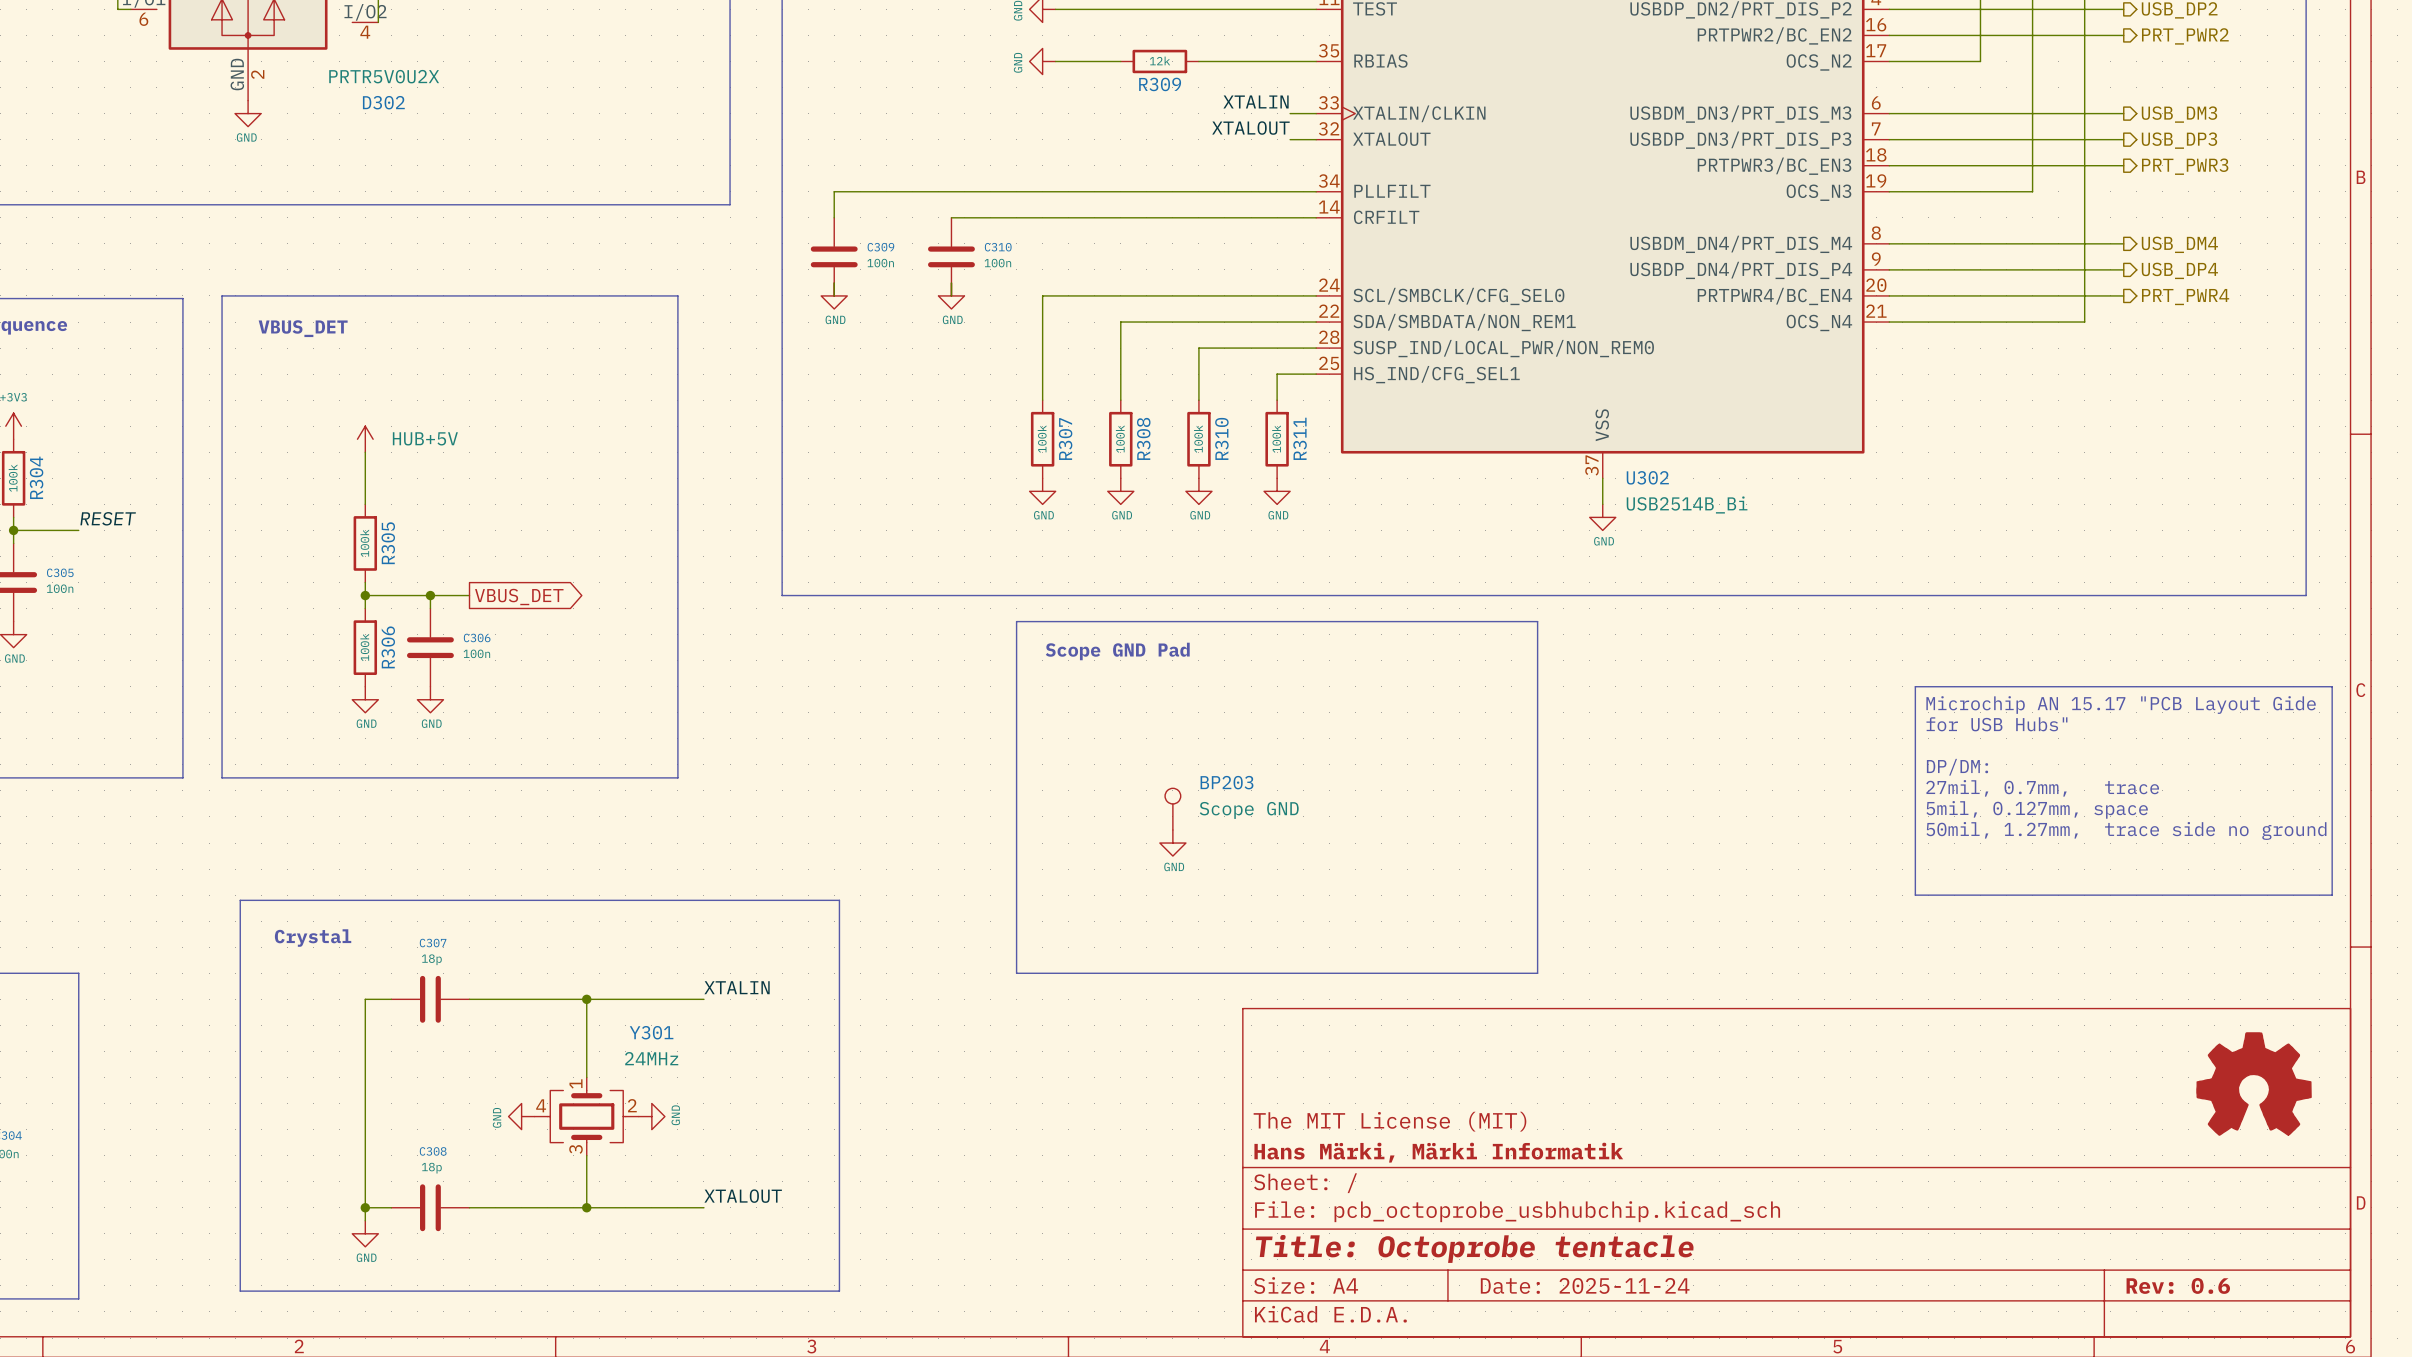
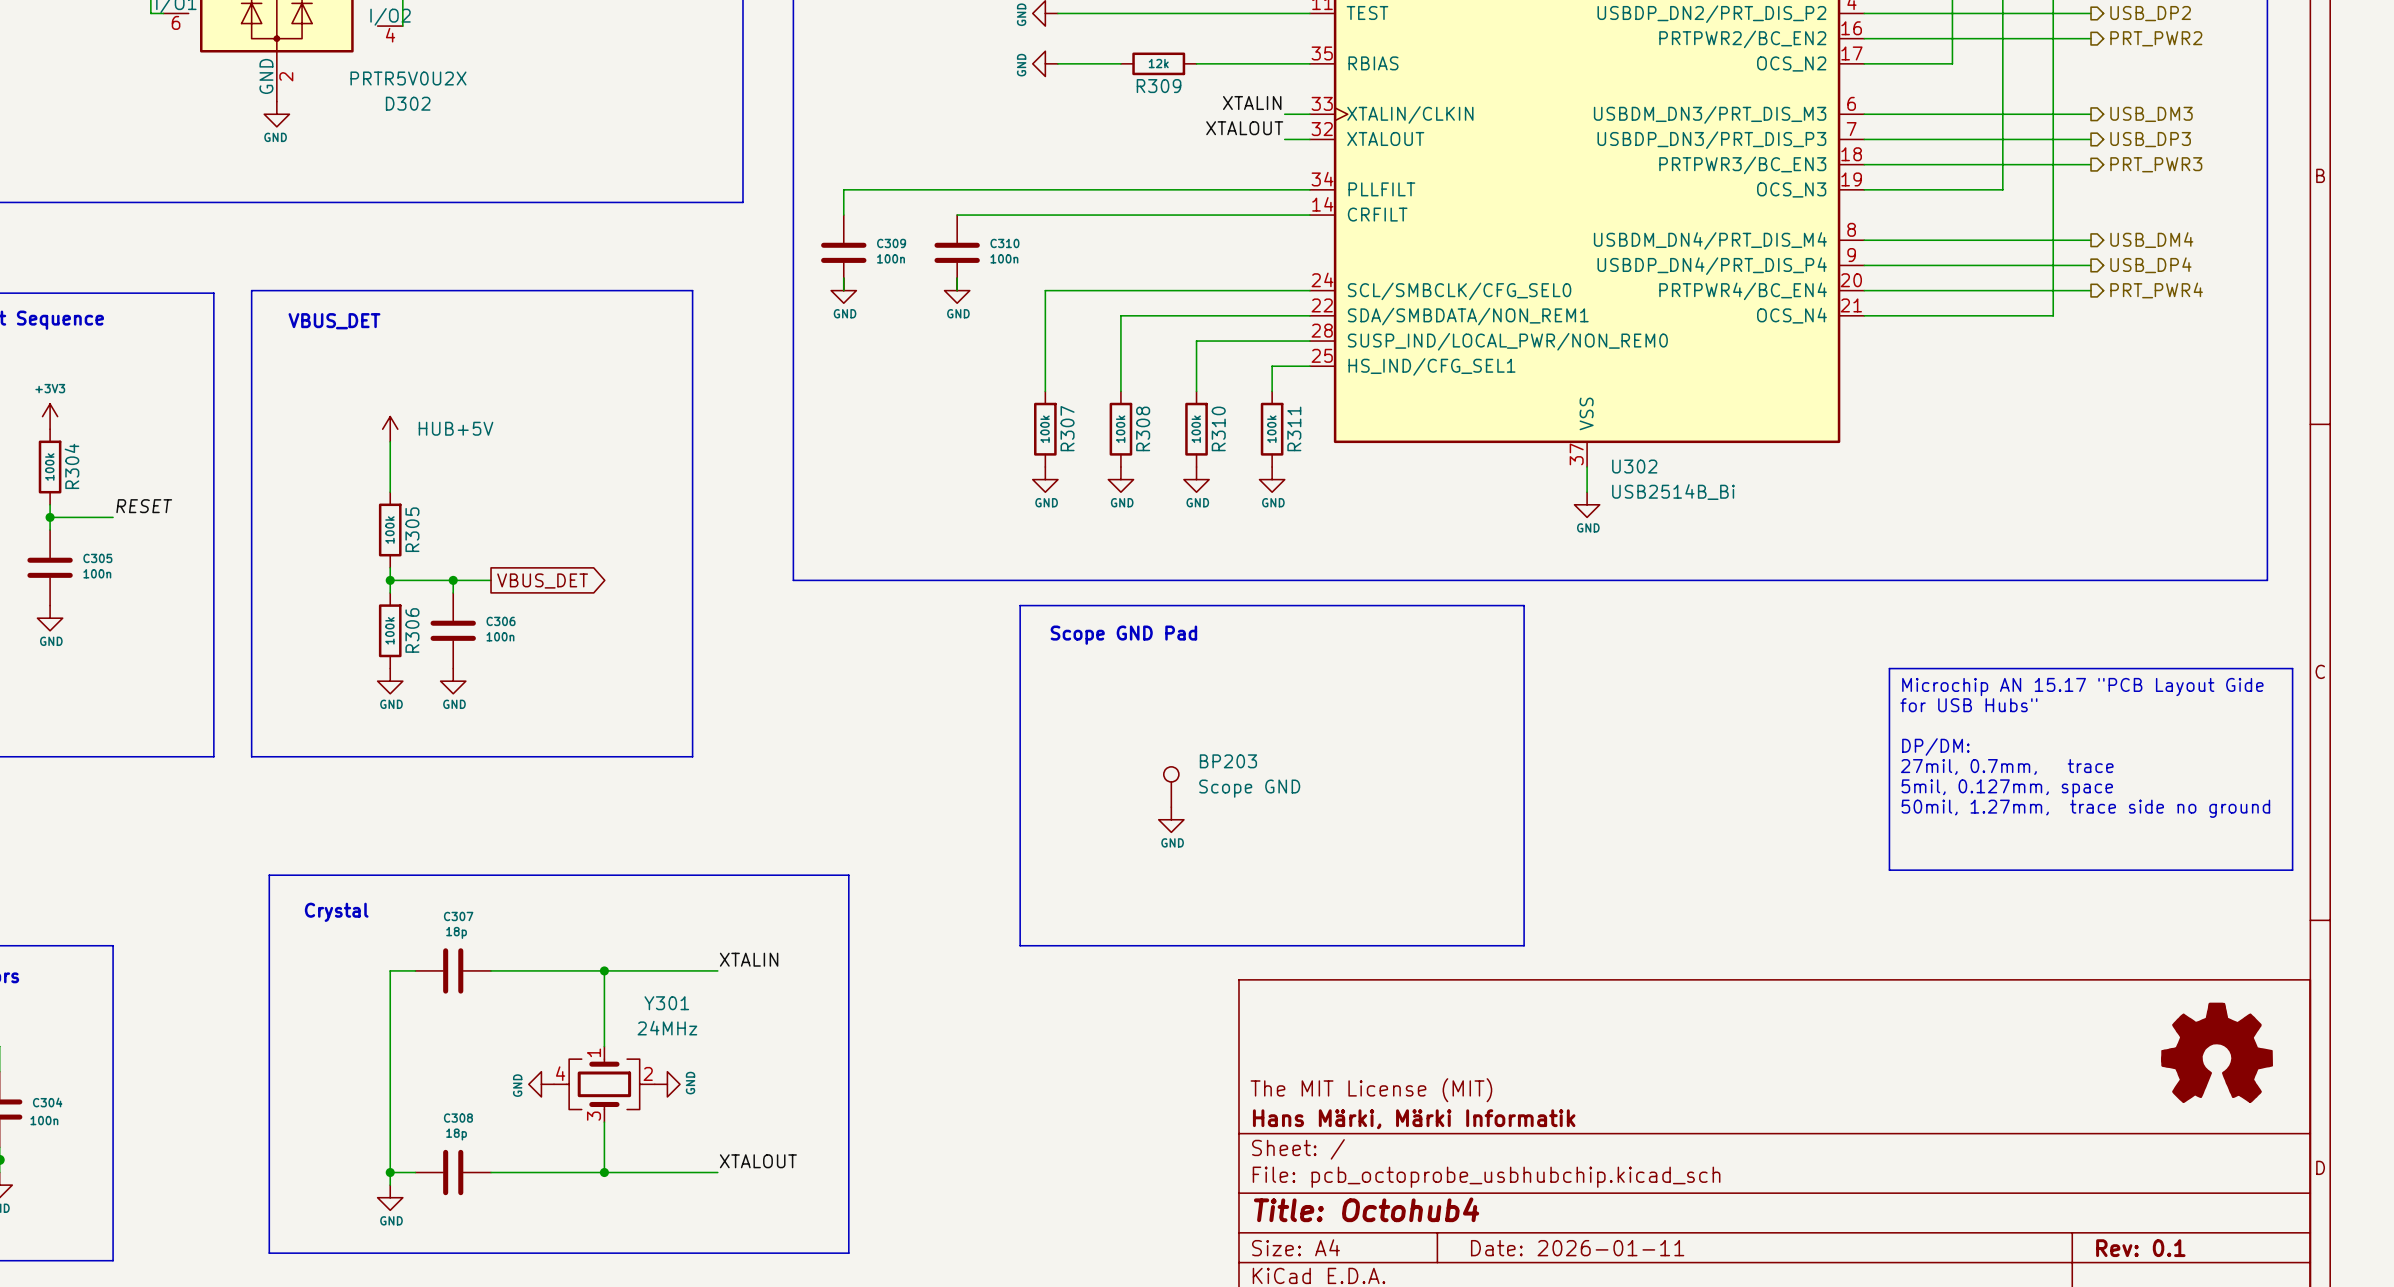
title block: Title: Octoprobe tentacle (1474, 1248) -> Title: Octohub4 (1366, 1209)
title block: Date: 2025-11-24 (1585, 1285) -> Date: 2026-01-11 (1577, 1248)
title block: Rev: 0.6 (2178, 1285) -> Rev: 0.1 (2140, 1248)

